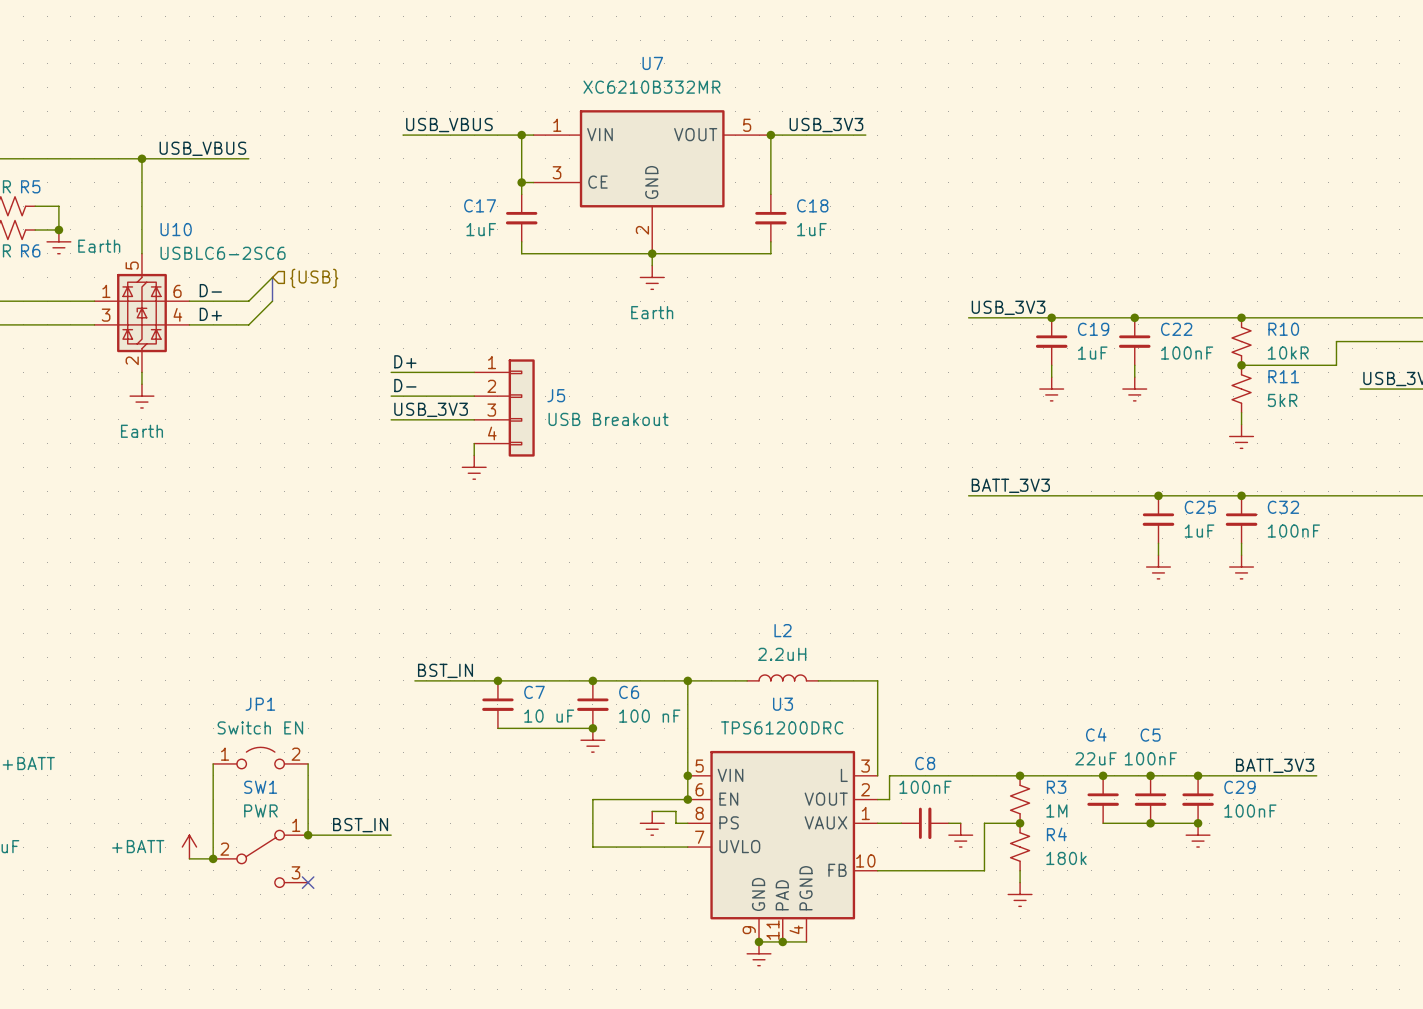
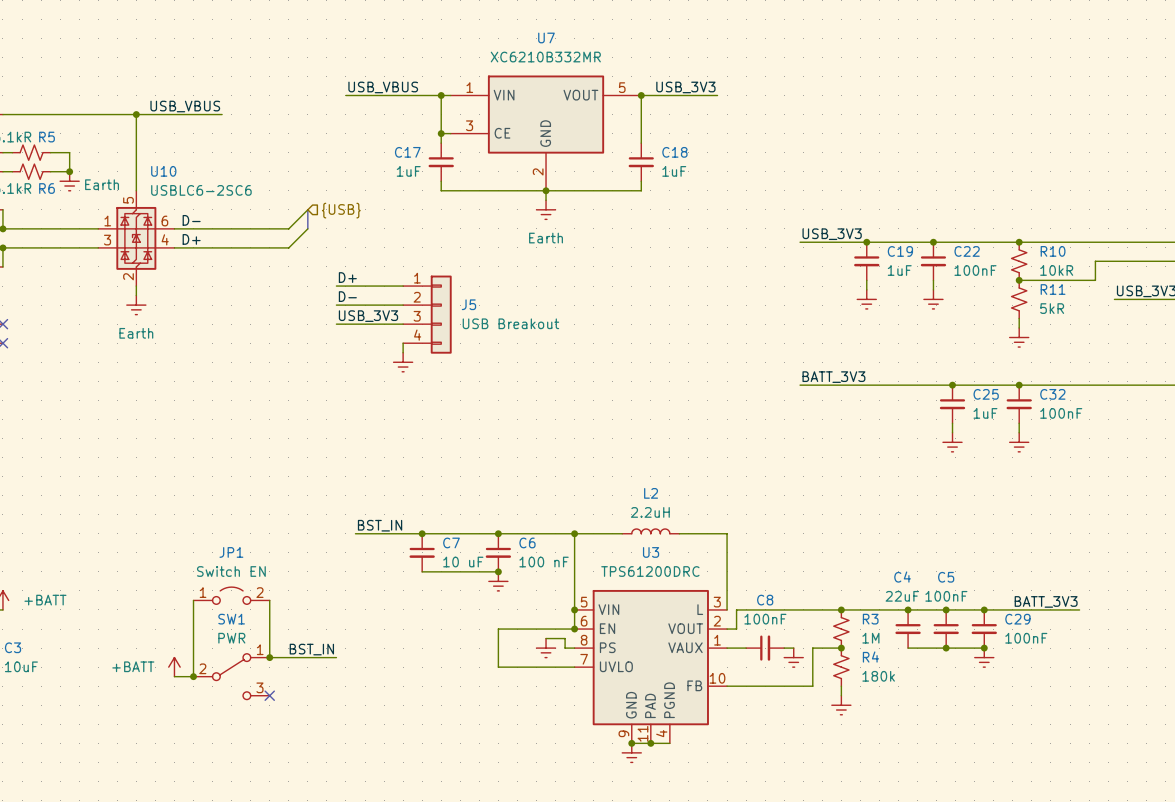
wire: (272, 277) (248, 301) -> (307, 209) (288, 228) (222, 228)
bus: (272, 277) (272, 301) -> (307, 209) (307, 228)
hierarchical label position: {USB} (314, 278) -> {USB} (341, 210)
wire: (272, 301) (248, 324) -> (307, 228) (288, 247) (222, 247)

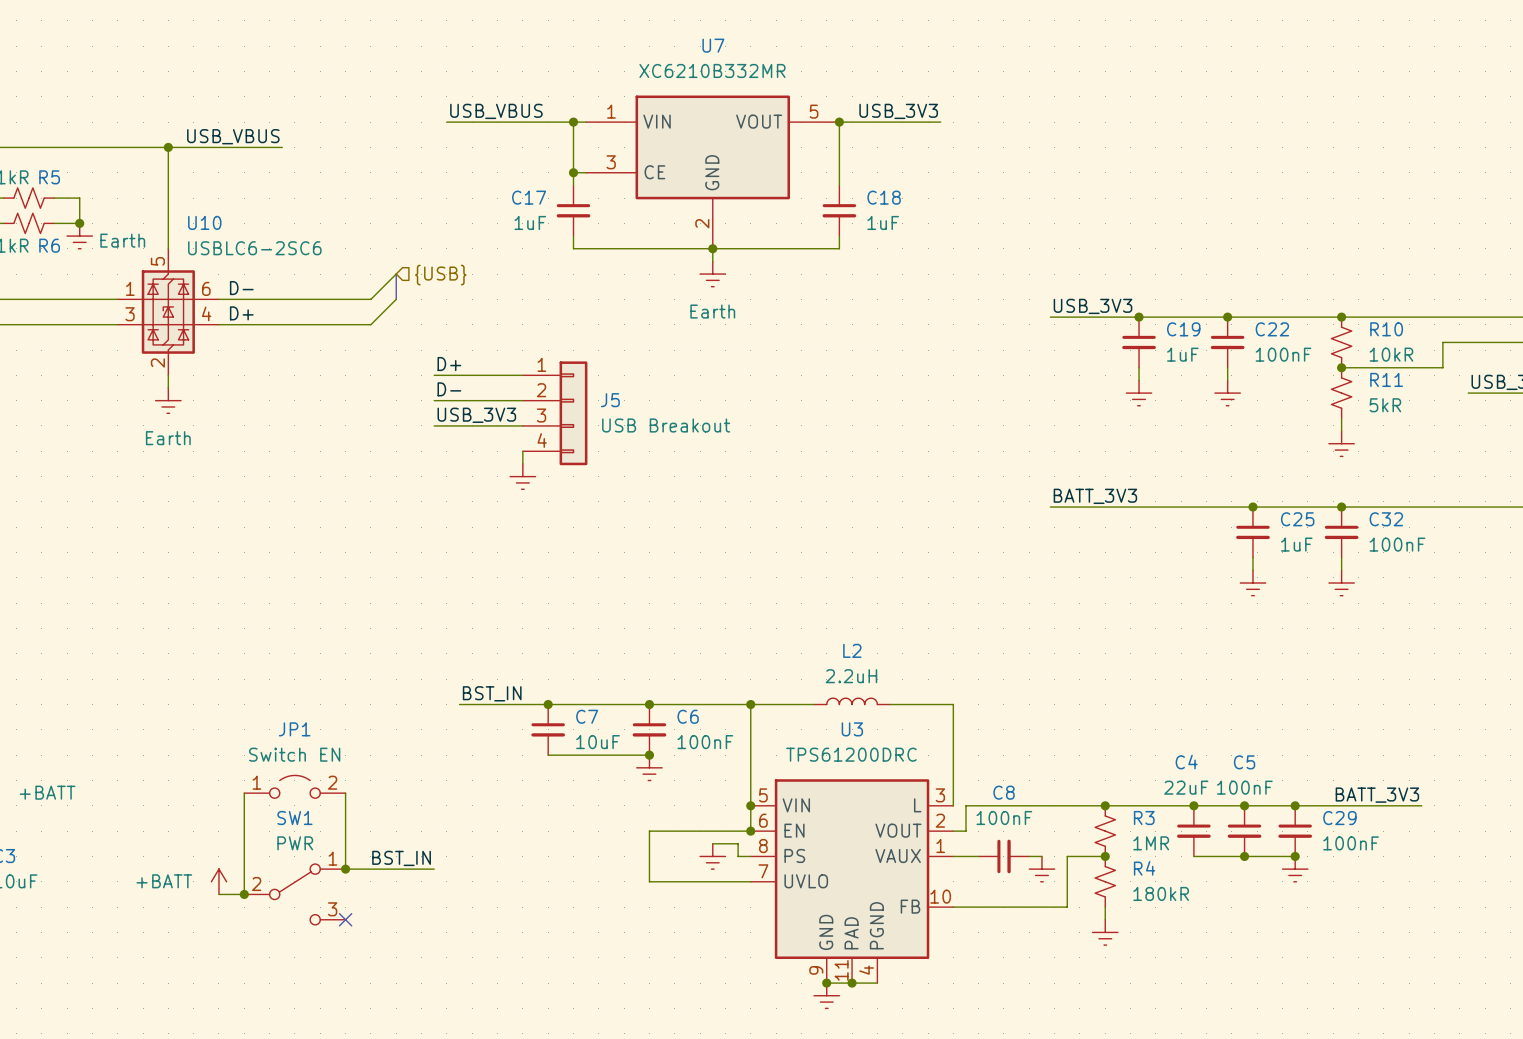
C7 value: 10 uF (463, 562) -> 10uF (598, 742)
C6 value: 100 nF (544, 562) -> 100nF (705, 742)
R3 value: 1M (870, 638) -> 1MR (1151, 843)
R4 value: 180k (878, 676) -> 180kR (1161, 893)

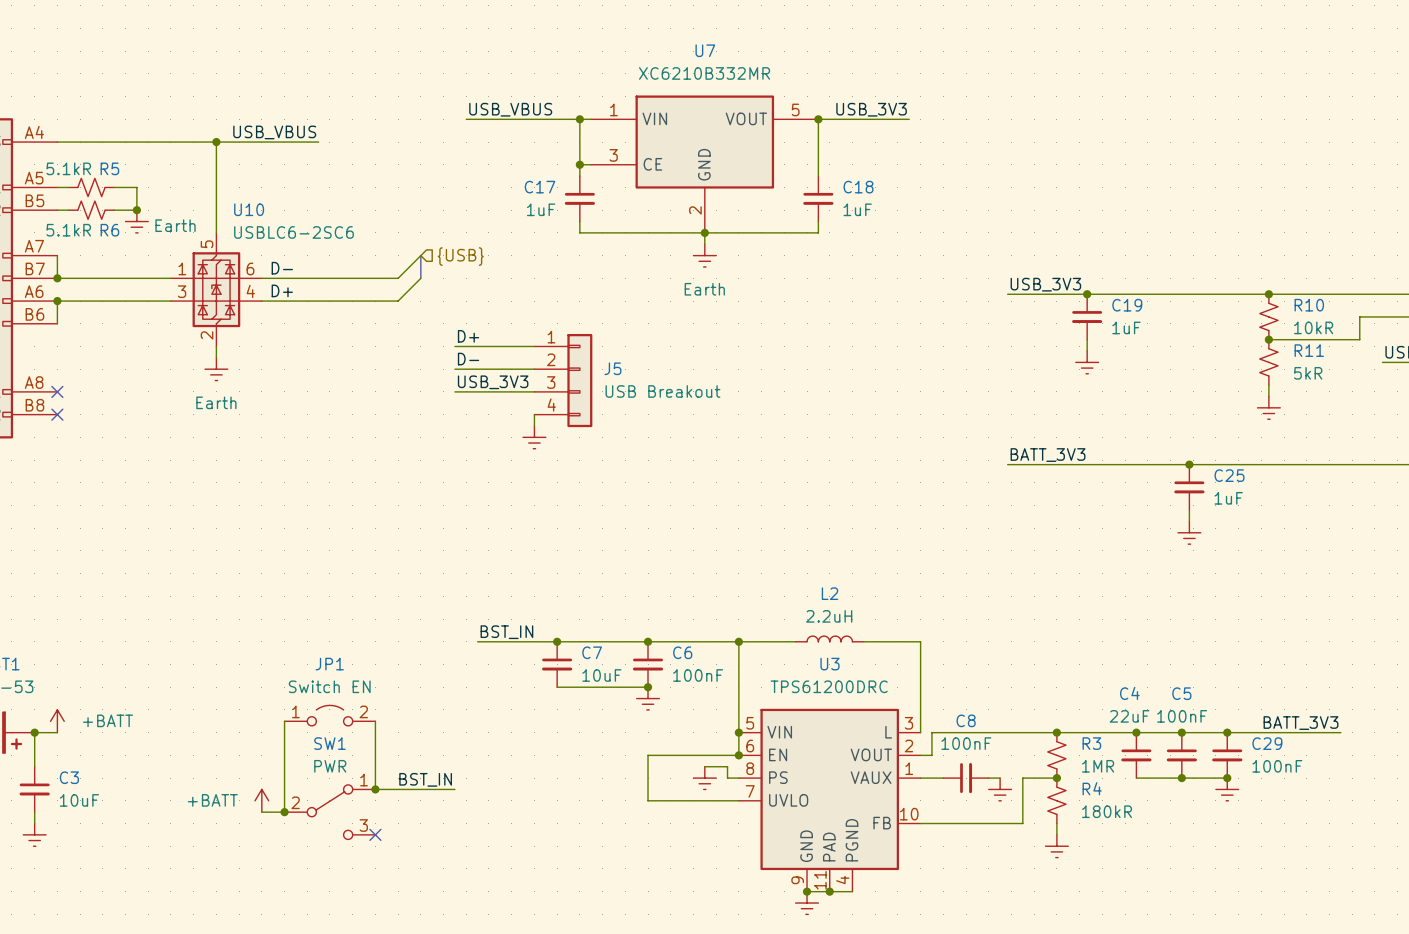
junction: (1227, 317) -> none
C22: 100nF (1227, 342) -> none
wire: (1227, 367) (1227, 380) -> none
power symbol: (1227, 393) -> none
junction: (1341, 507) -> none
C32: 100nF (1341, 532) -> none
wire: (1341, 557) (1341, 570) -> none
power symbol: (1341, 583) -> none

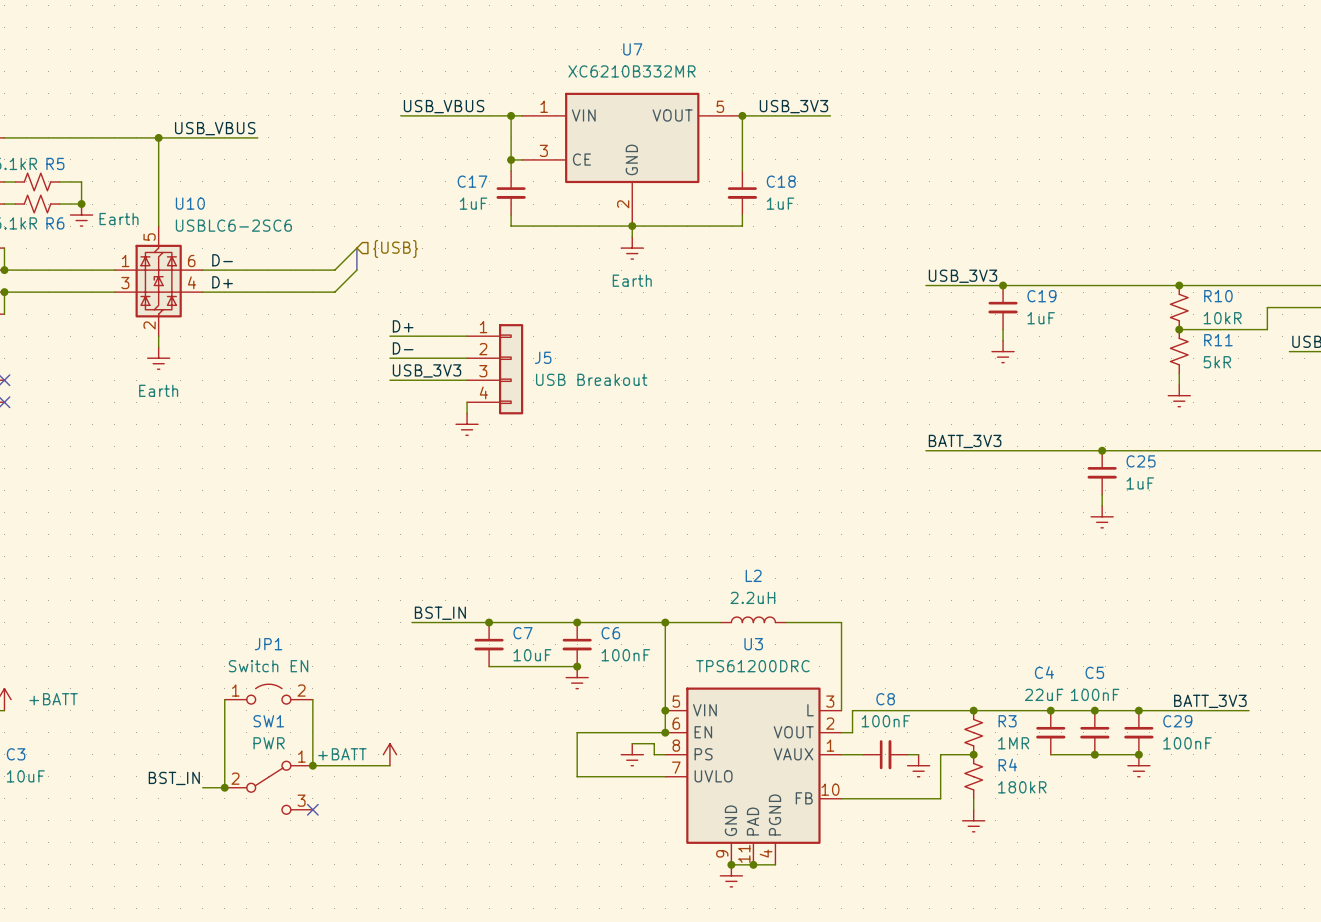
label position: BST_IN (425, 779) -> BST_IN (174, 778)
power symbol position: +BATT (261, 800) -> +BATT (389, 754)

